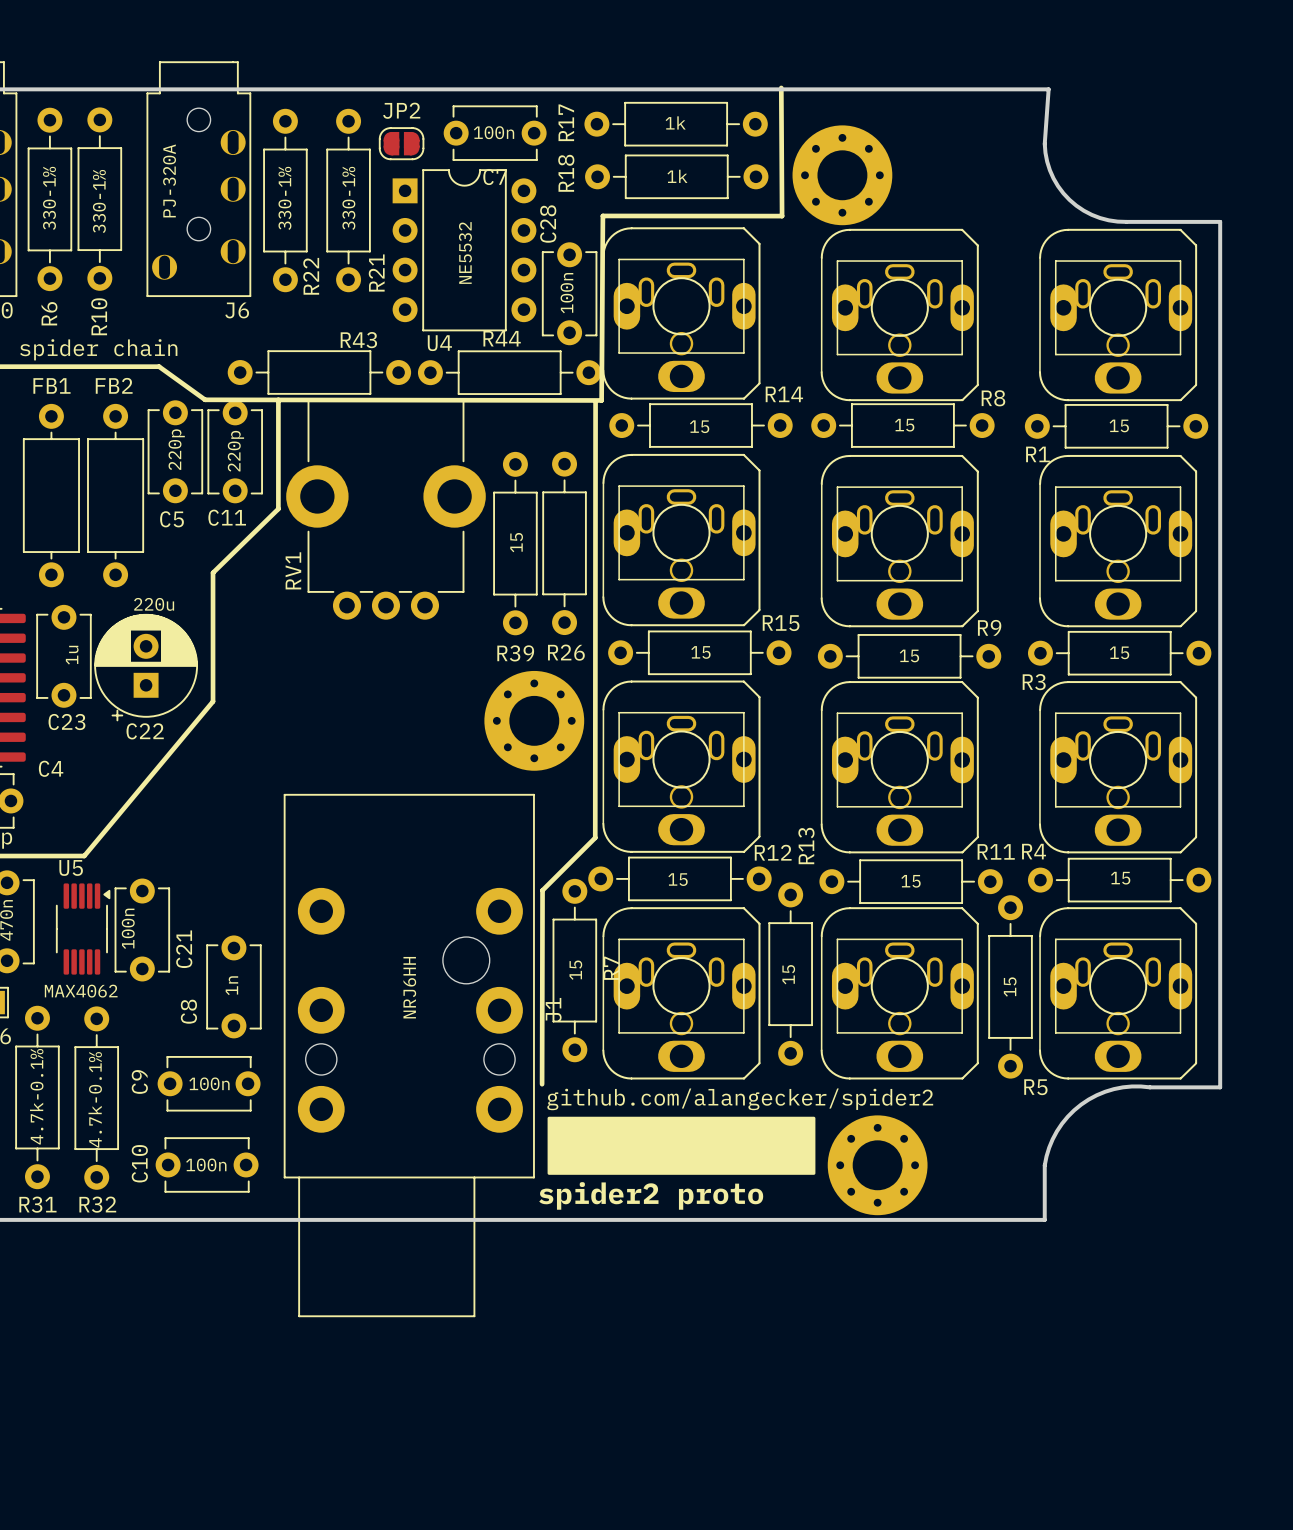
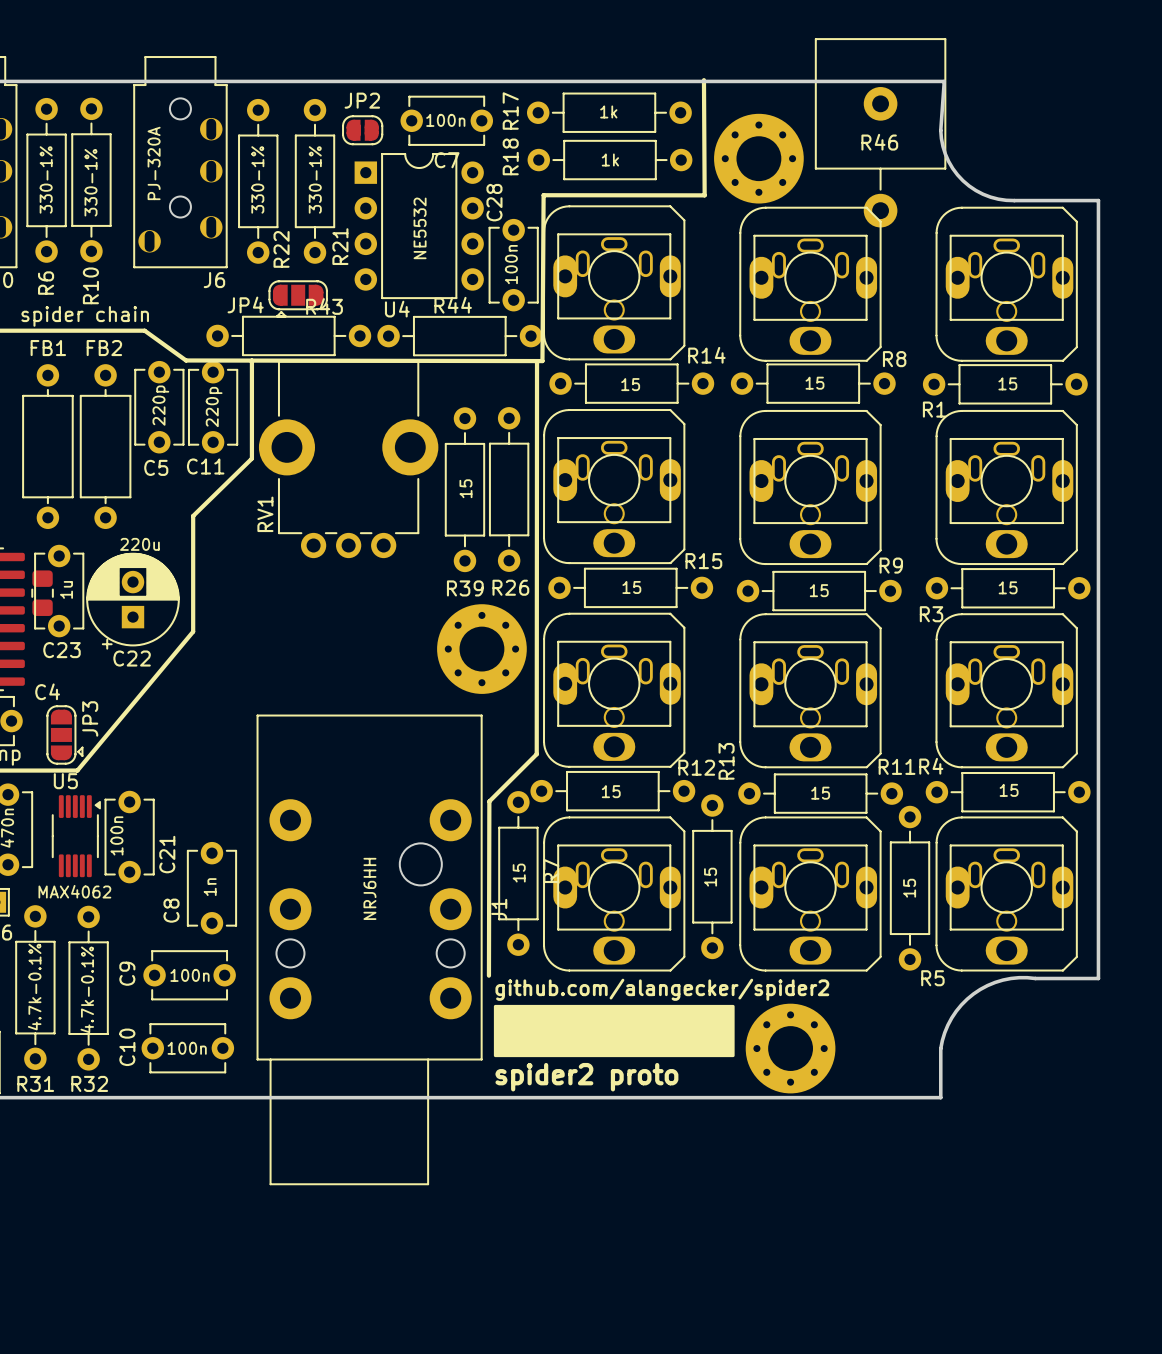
R46: none -> (880, 132)
JP4: none -> (298, 298)
part: none -> (42, 593)
JP3: none -> (64, 734)

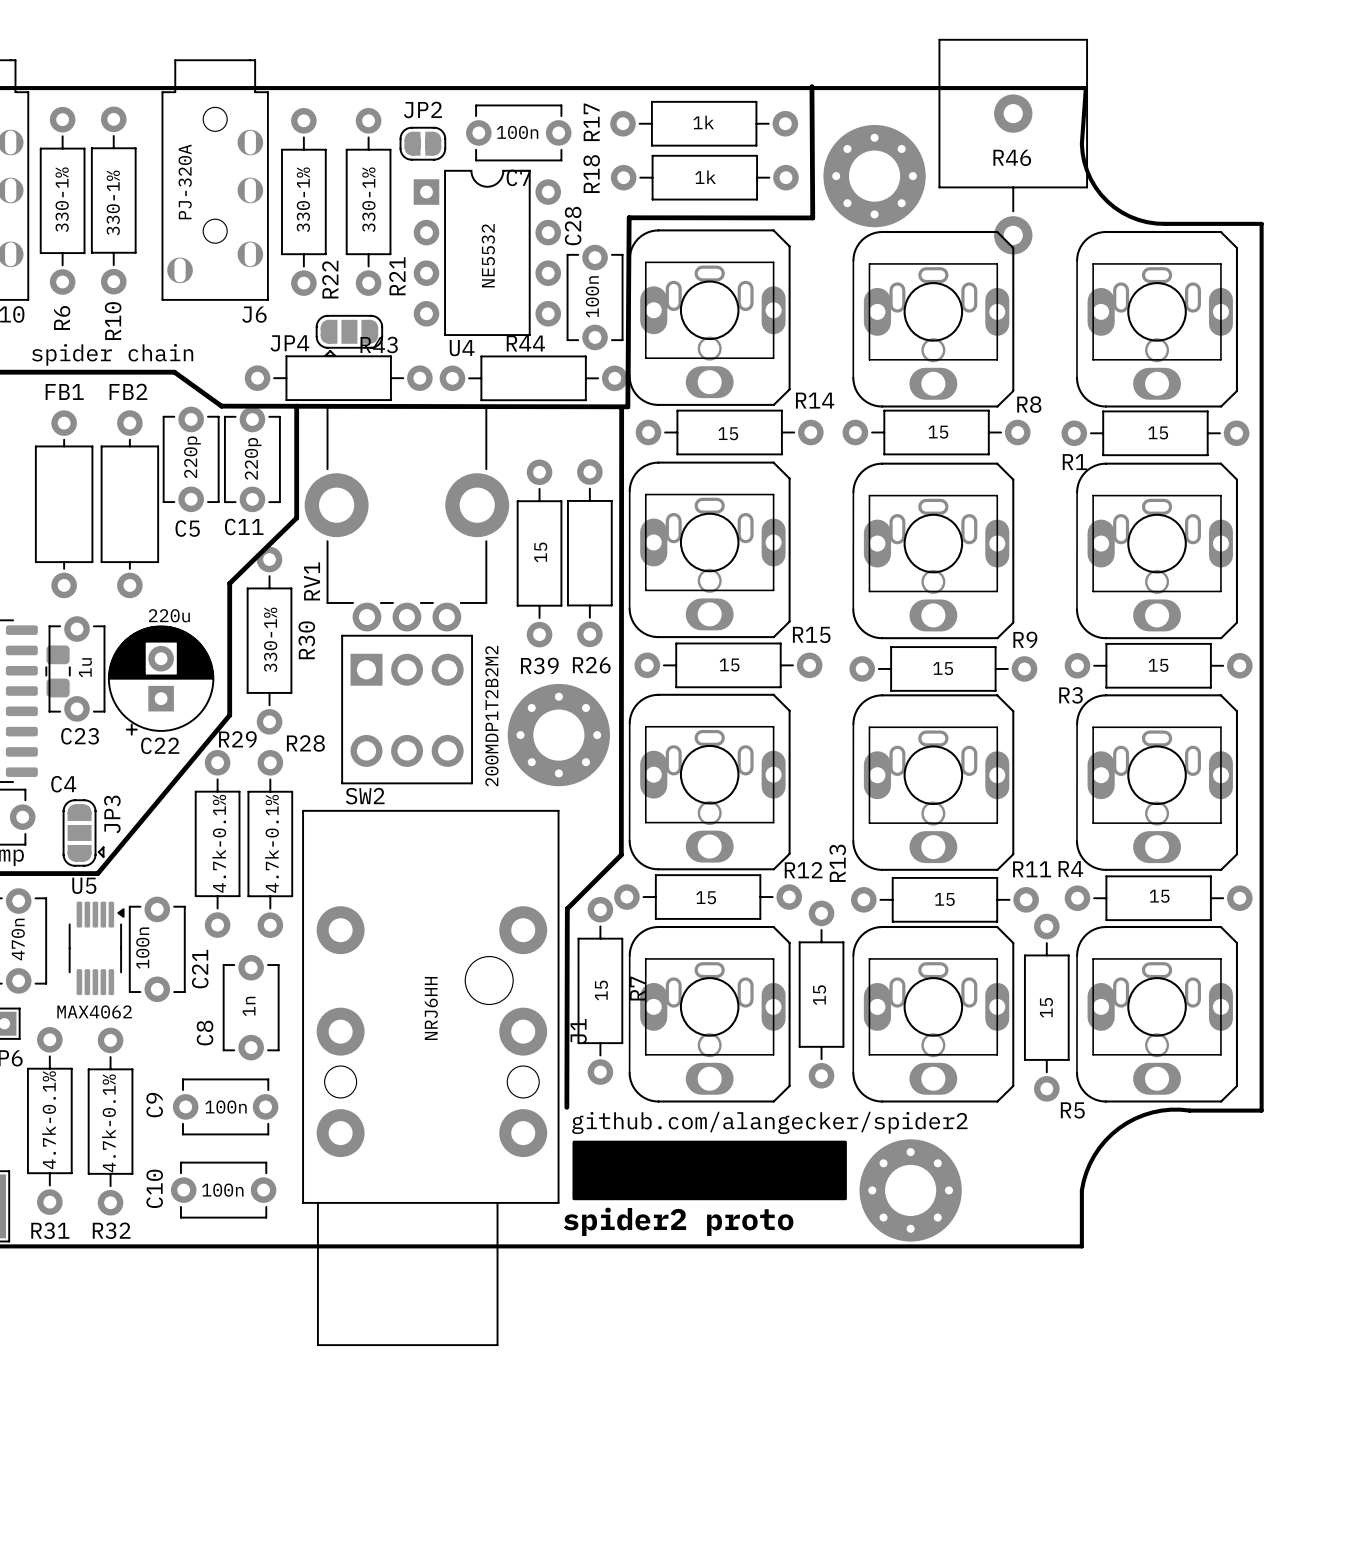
R30: none -> 330-1% (269, 640)
SW2: none -> 200MDP1T2B2M2 (407, 709)
R29: none -> 4.7k-0.1% (217, 843)
R28: none -> 4.7k-0.1% (270, 843)

